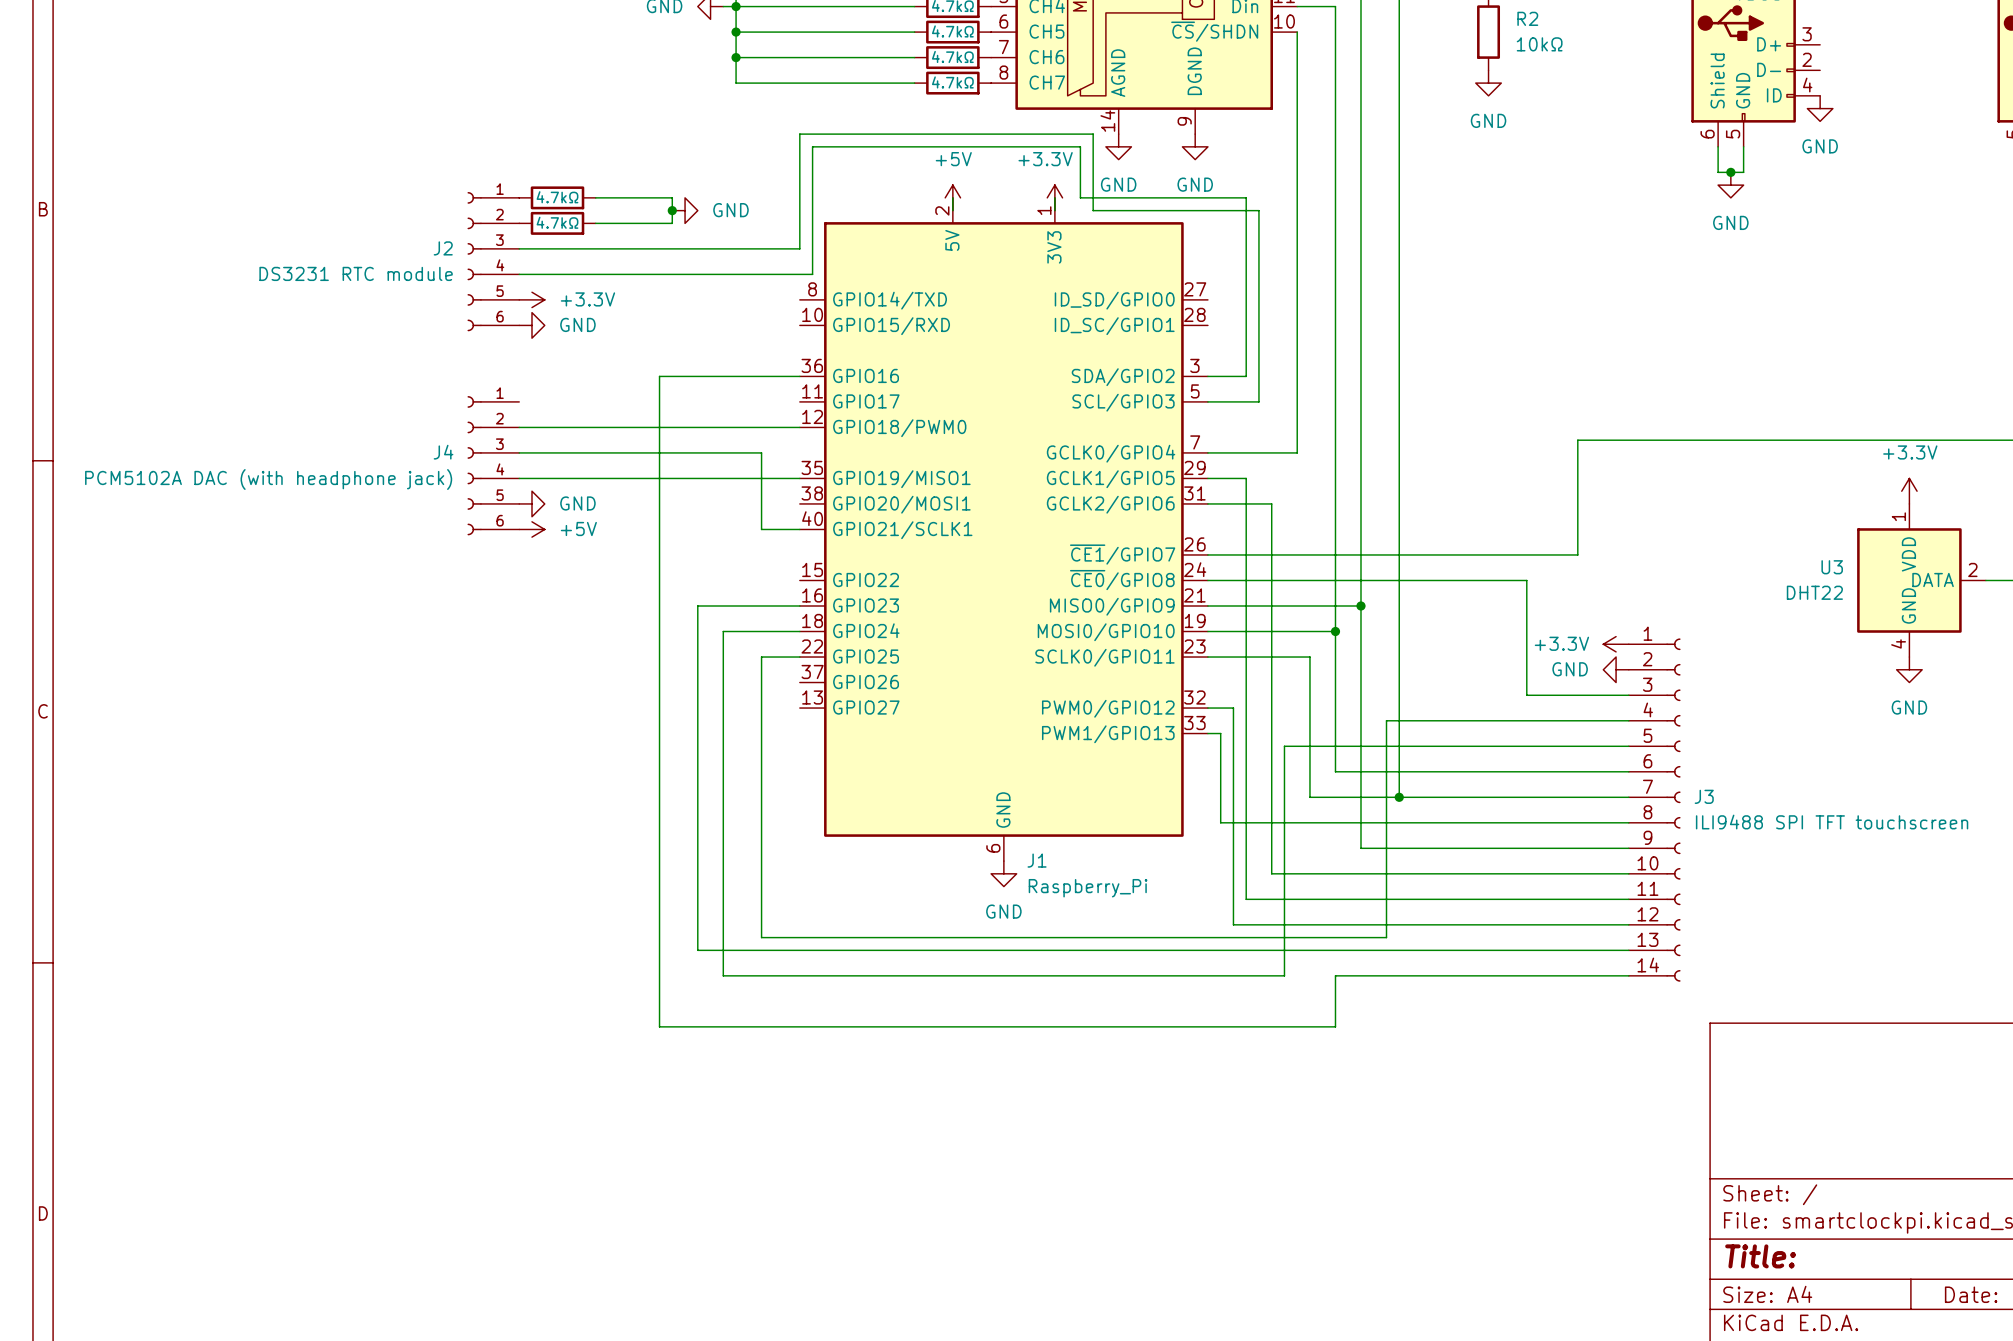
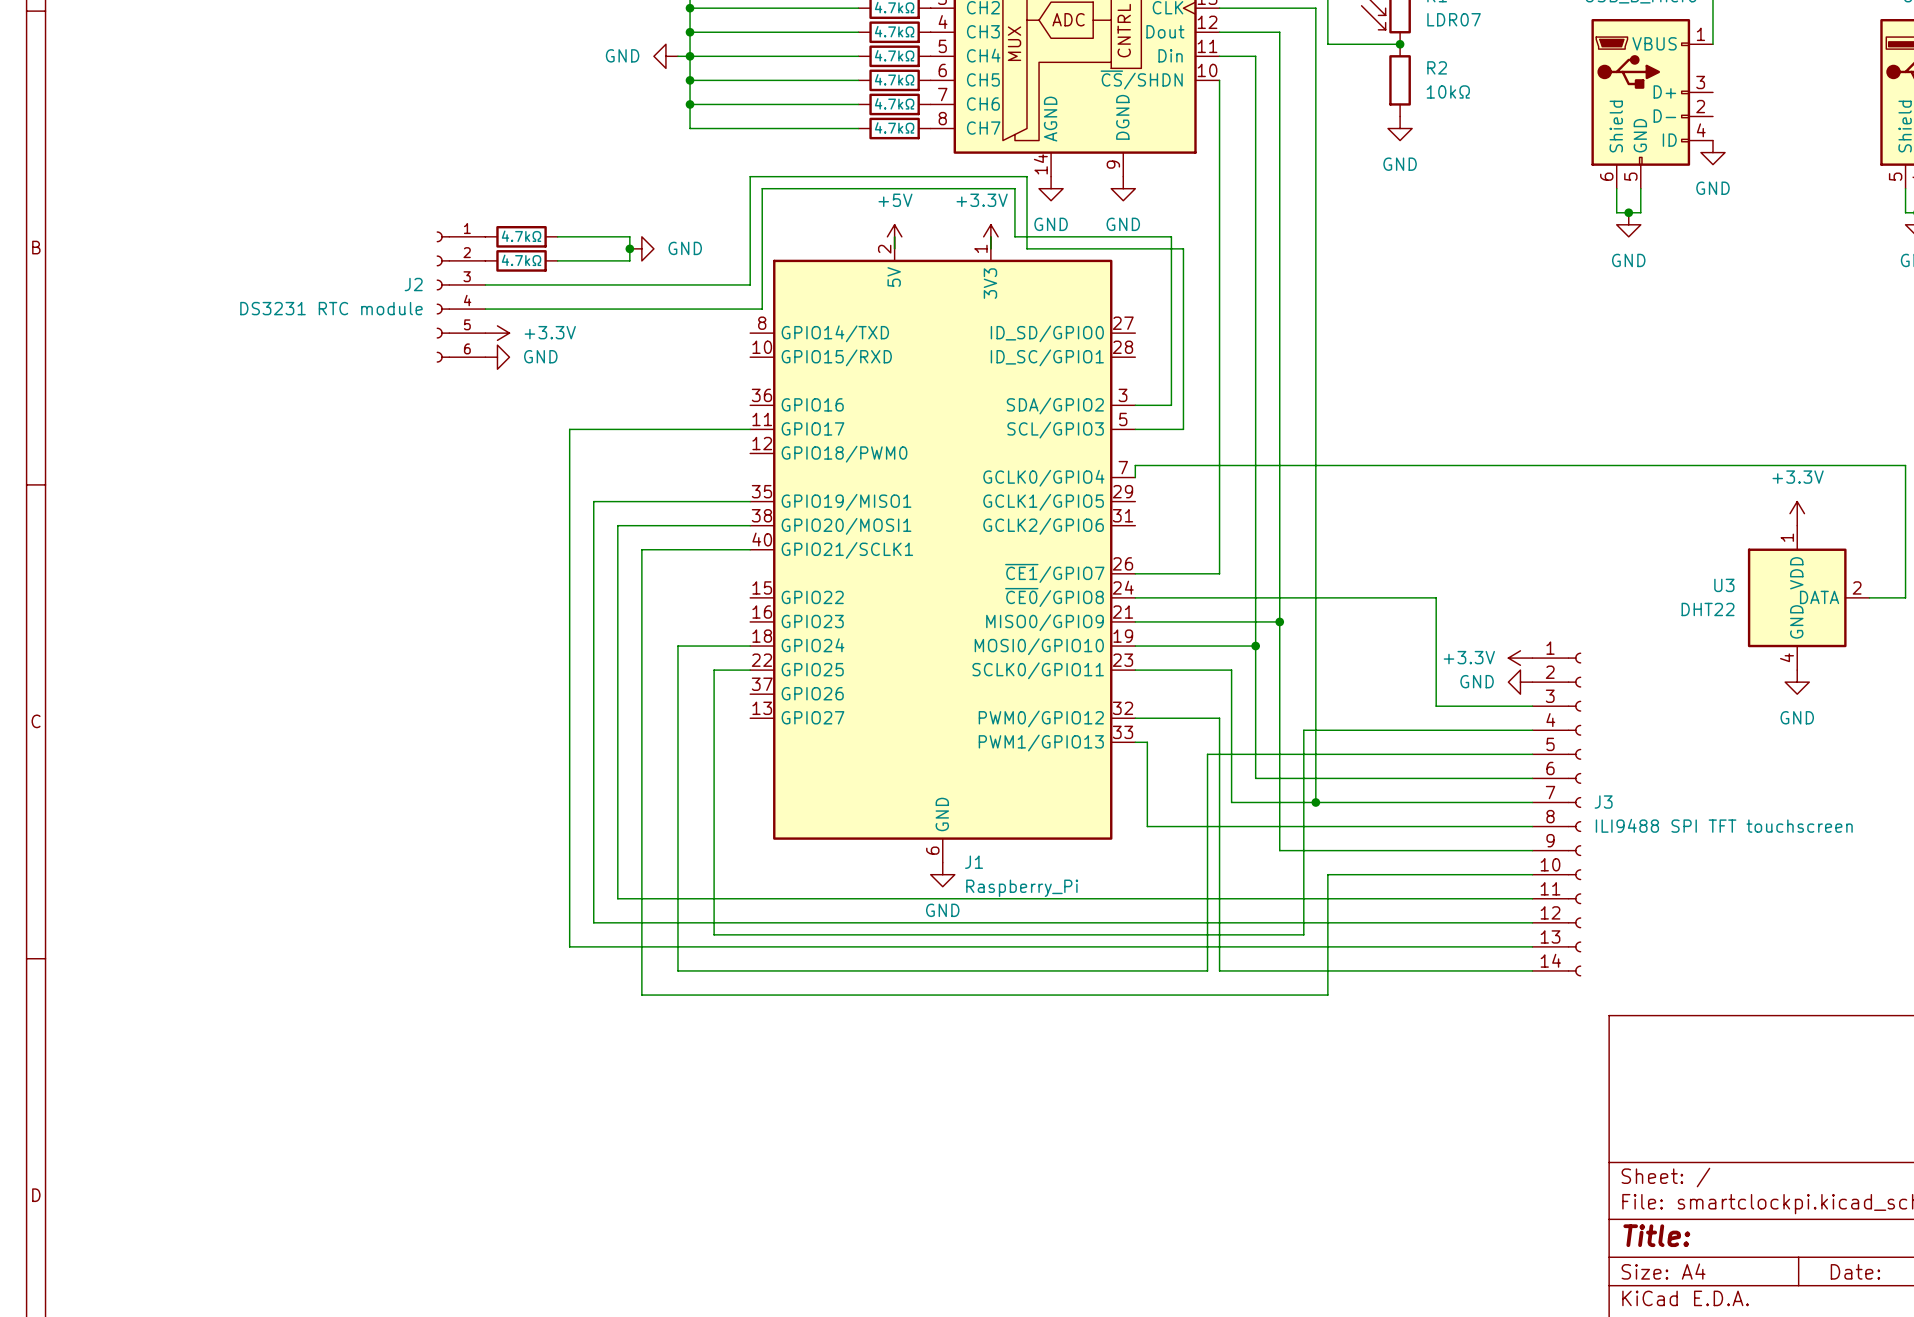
wire: (799, 376) (659, 376) (659, 503) -> (750, 525) (617, 525)
wire: (519, 427) (799, 427) -> none
wire: (1577, 440) (1577, 554) (1297, 554) -> (1484, 465) (1135, 465) (1135, 477)
wire: (519, 452) (761, 452) (761, 529) -> none
wire: (1207, 452) (1297, 452) -> (1219, 573) (1219, 477)
J4: PCM5102A DAC (with headphone jack) (493, 465) -> none
wire: (519, 478) (634, 478) -> (1159, 922) (593, 922) (593, 501)
wire: (1207, 478) (1246, 478) (1246, 899) -> none
power symbol: GND (531, 503) -> none
wire: (1207, 503) (1271, 503) (1271, 873) (1412, 873) -> (714, 549) (641, 549) (641, 995) (1327, 995) (1327, 874)
power symbol: +5V (531, 529) -> none
wire: (799, 605) (697, 605) (697, 950) -> (750, 429) (569, 429) (569, 946) (653, 946)
wire: (1233, 708) (1233, 924) -> (1159, 718) (1219, 718) (1219, 970) (1255, 970)
wire: (659, 899) (659, 1026) (1335, 1026) (1335, 975) -> (617, 898) (1171, 898)

